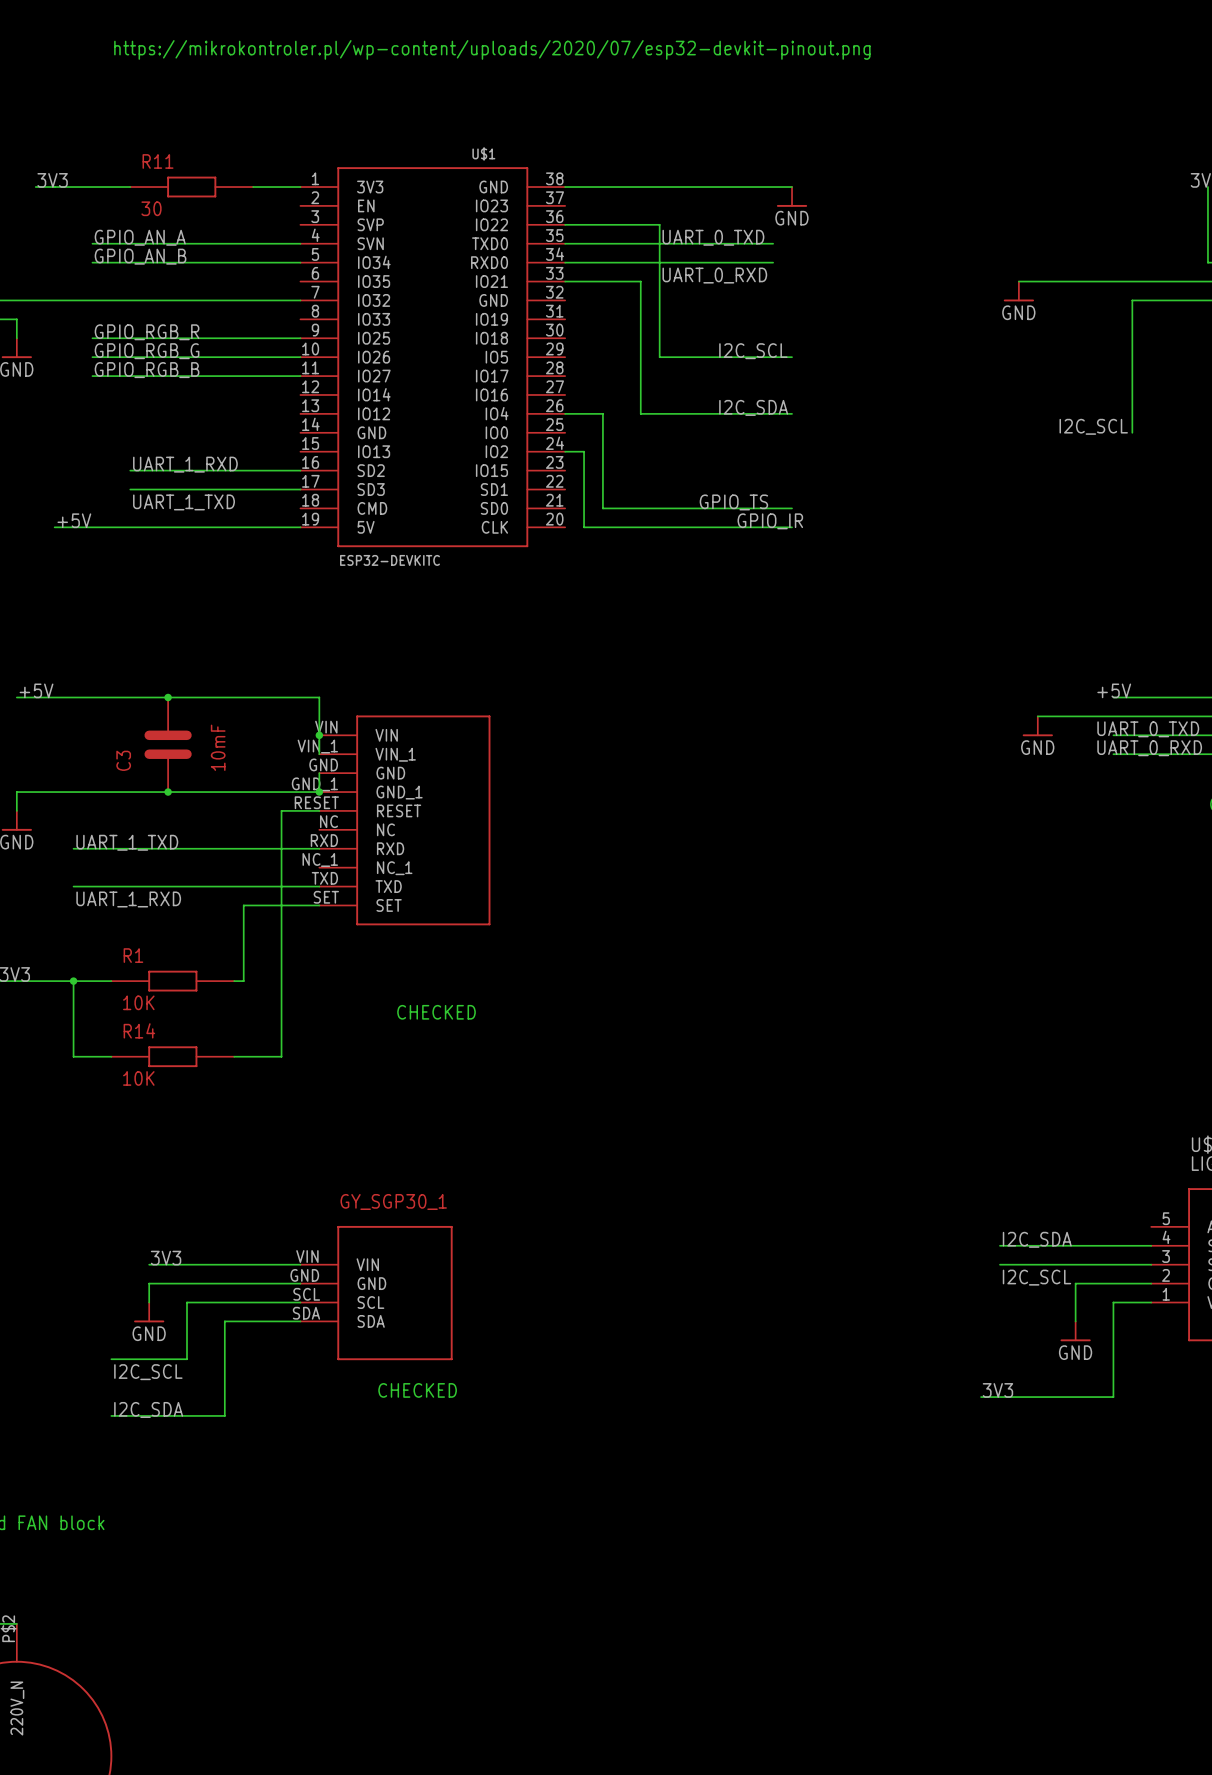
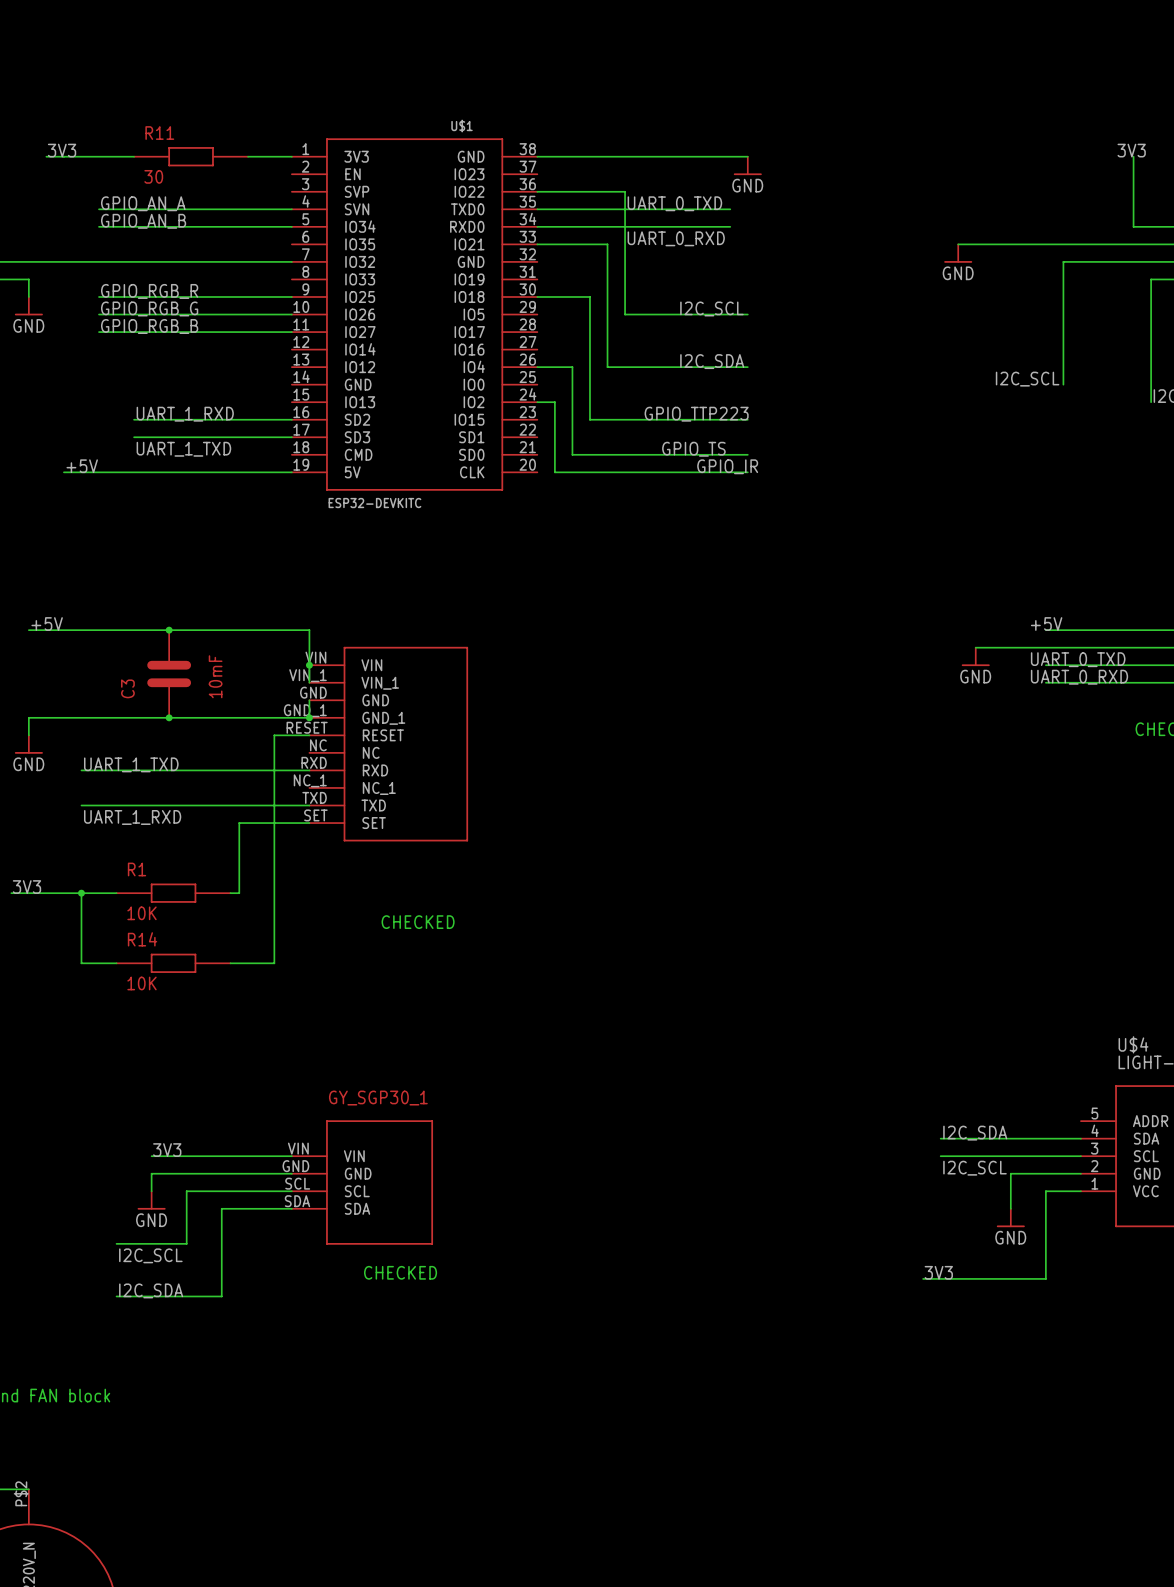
text: https://mikrokontroler.pl/wp-content/uploads/2020/07/esp32-devkit-pinout.png (492, 49) -> none
wire: none -> (537, 296) (589, 296) (589, 419) (747, 419)
label: none -> GPIO_TTP223 (696, 414)

